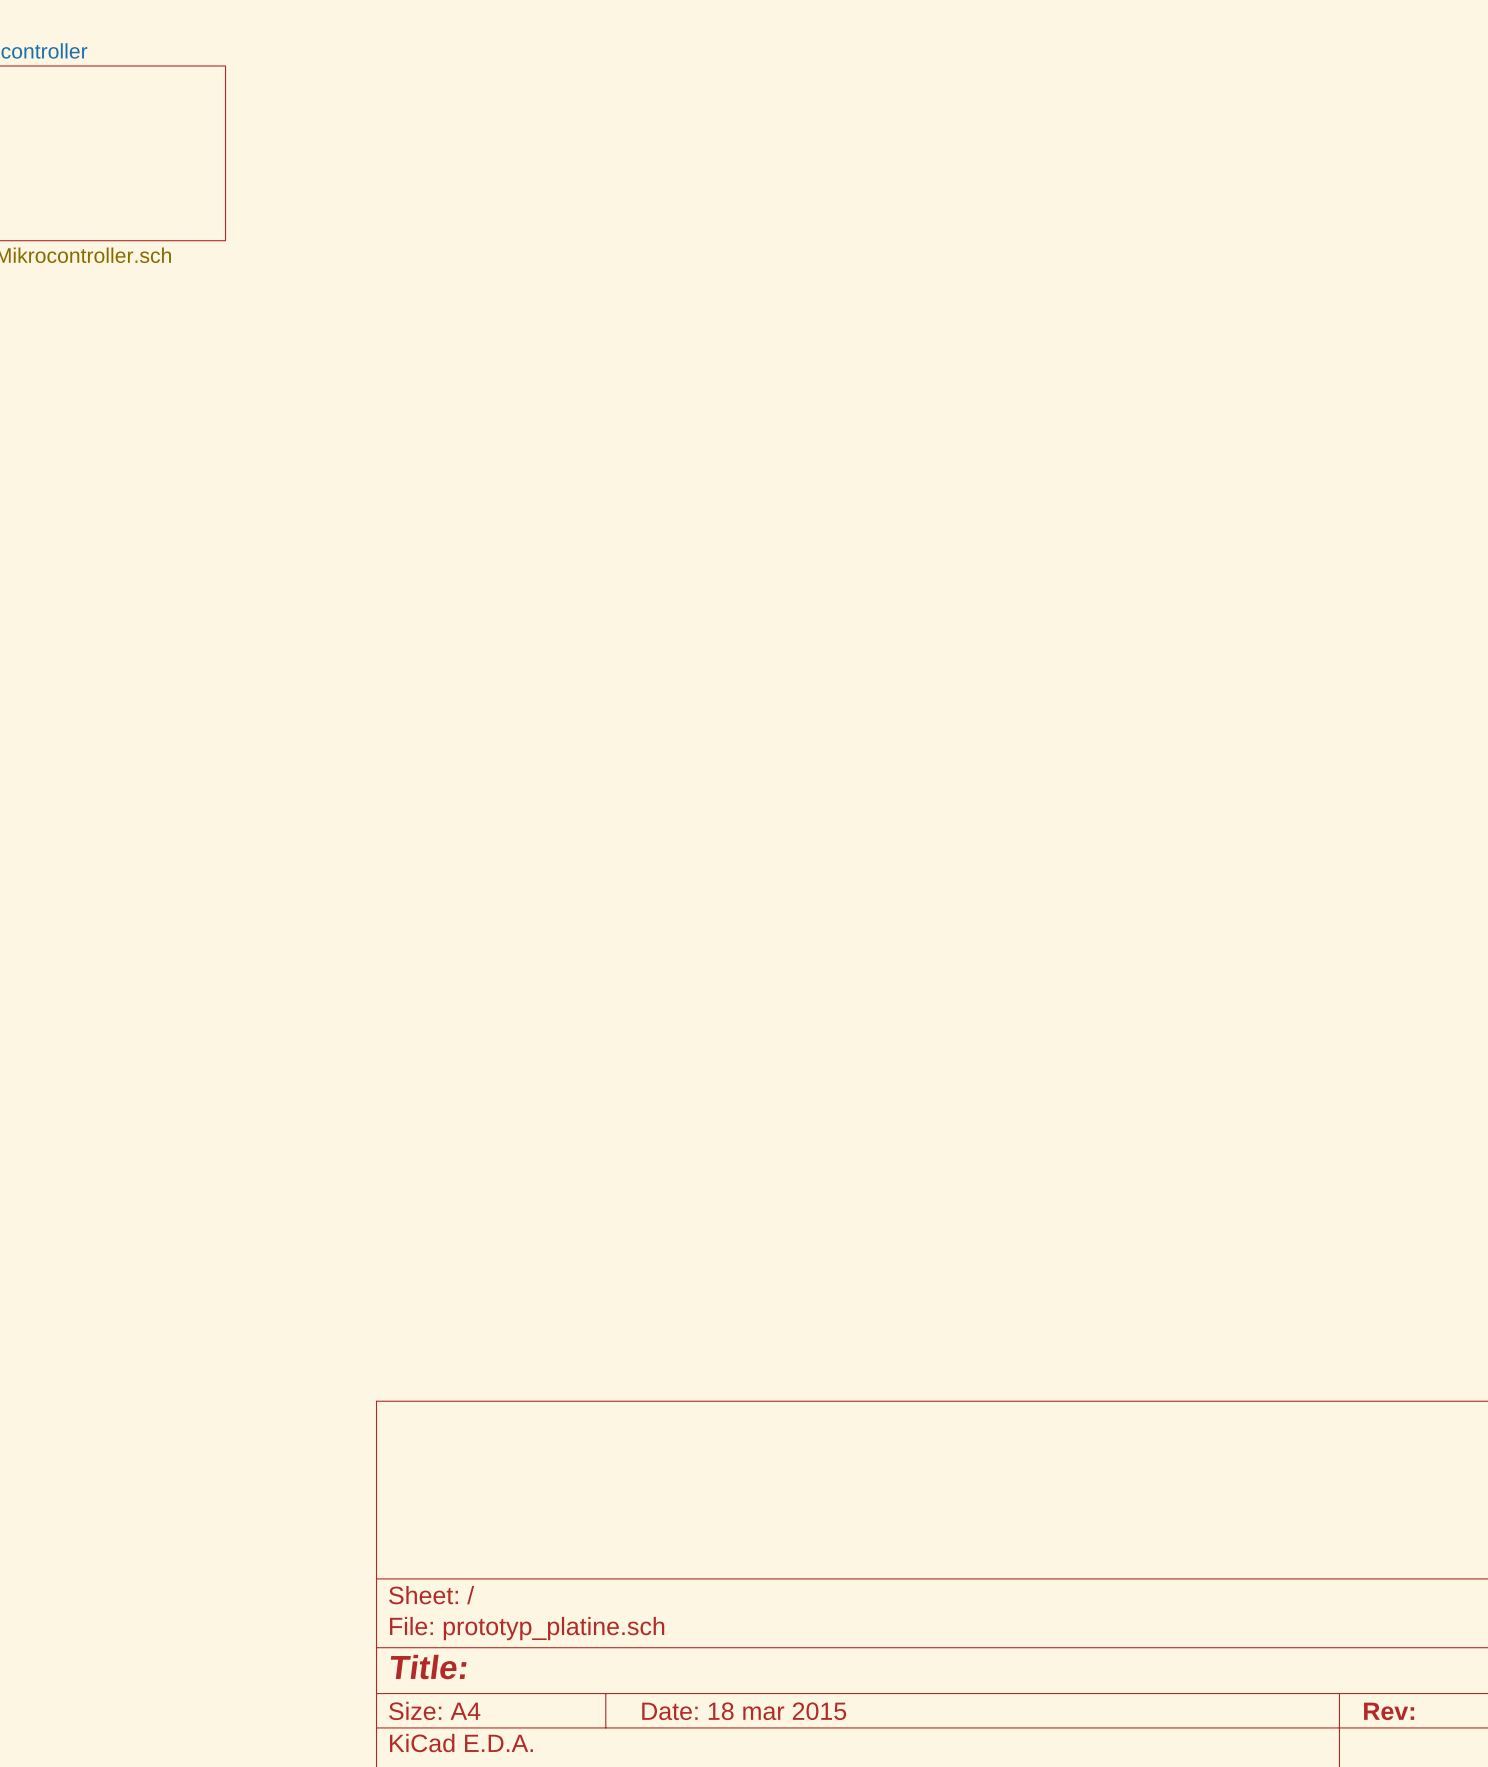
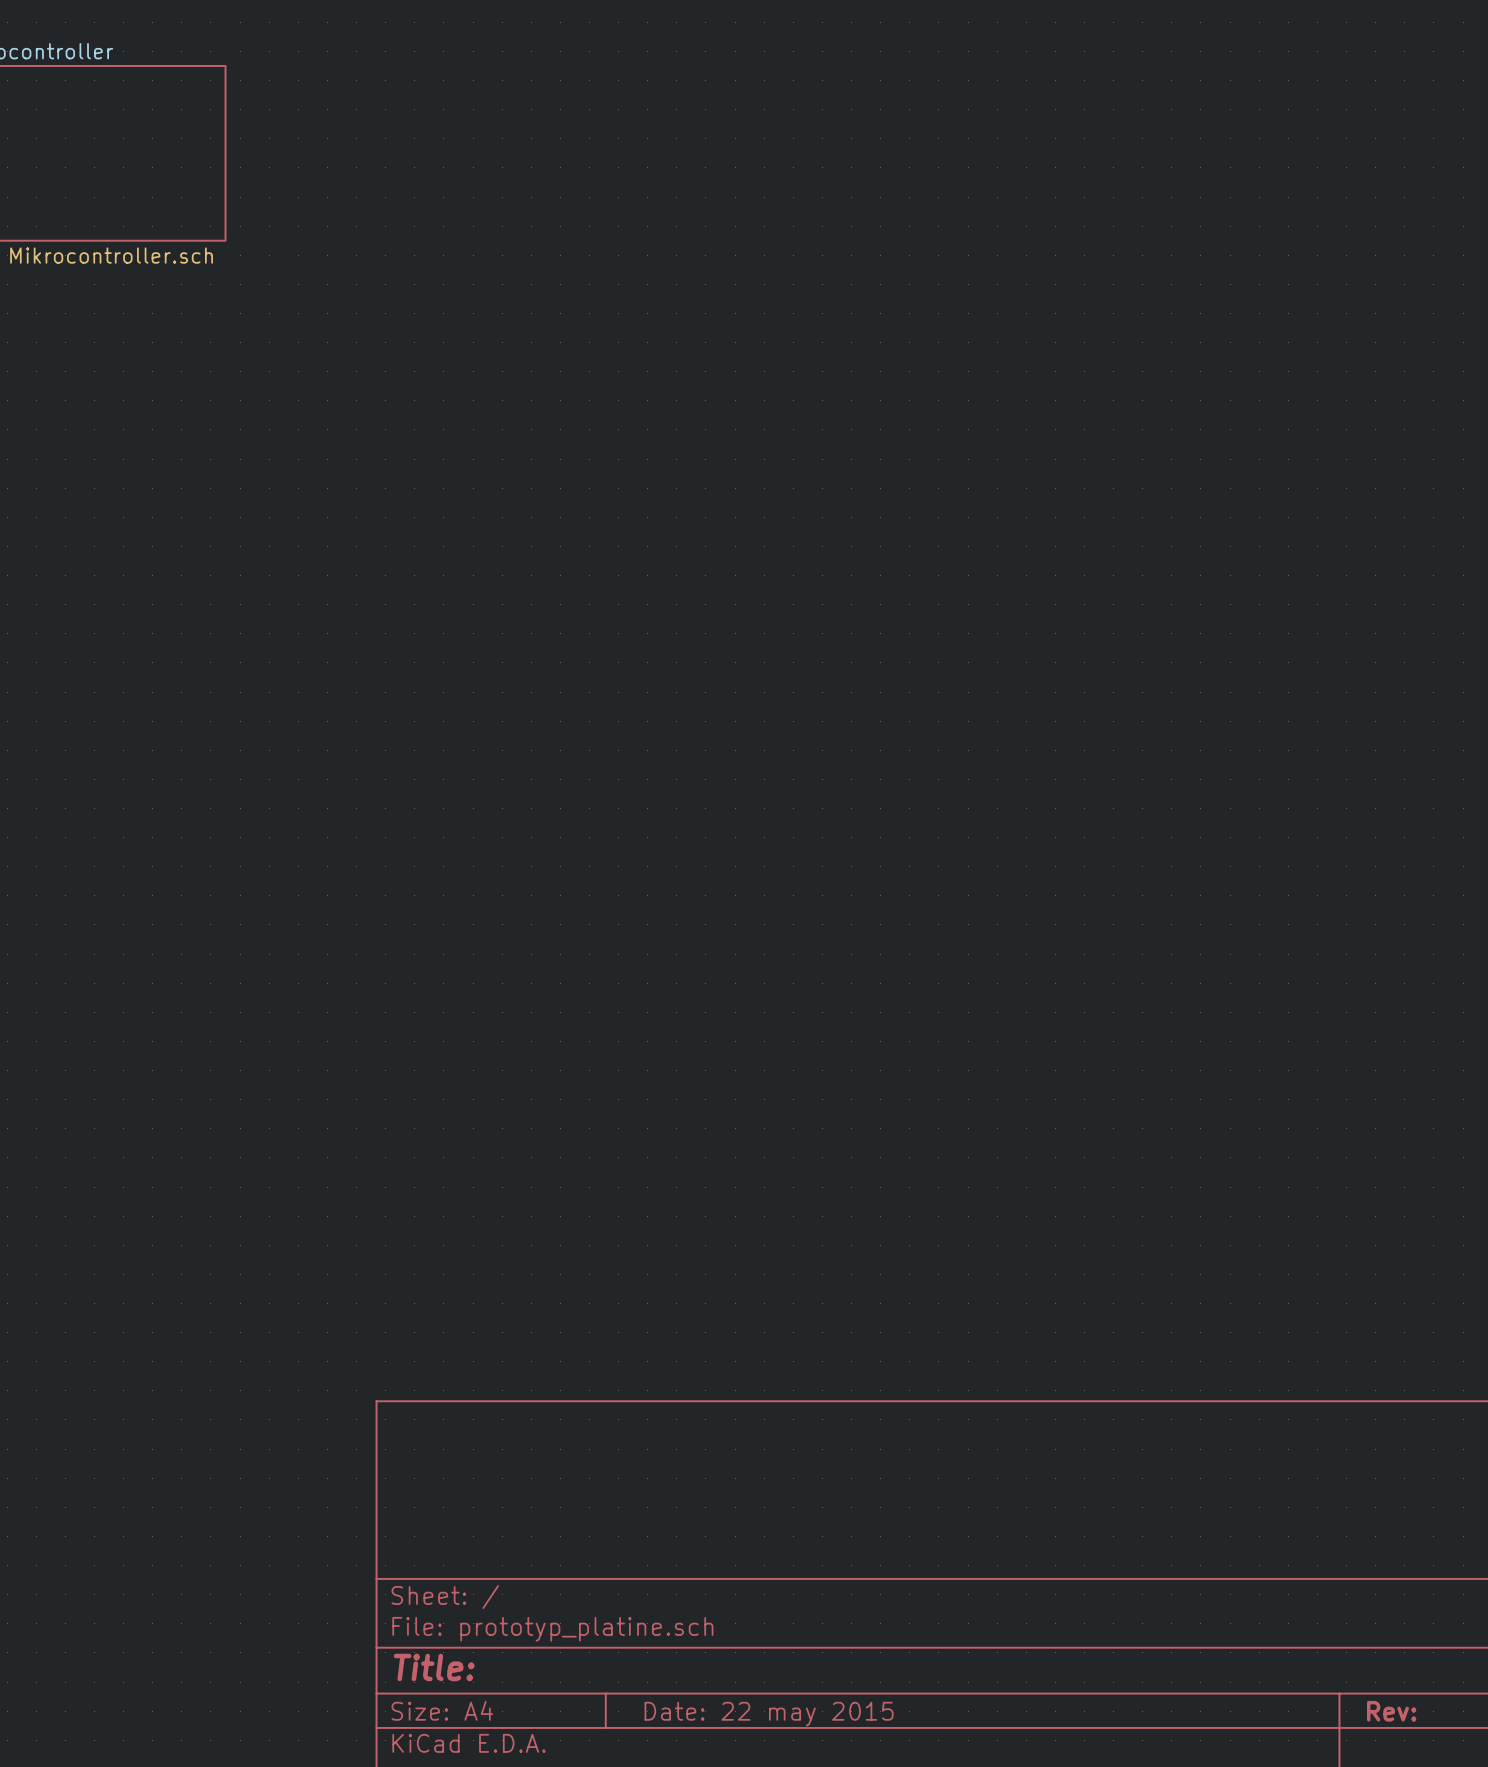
title block: Date: 18 mar 2015 (744, 1711) -> Date: 22 may 2015 (769, 1714)

